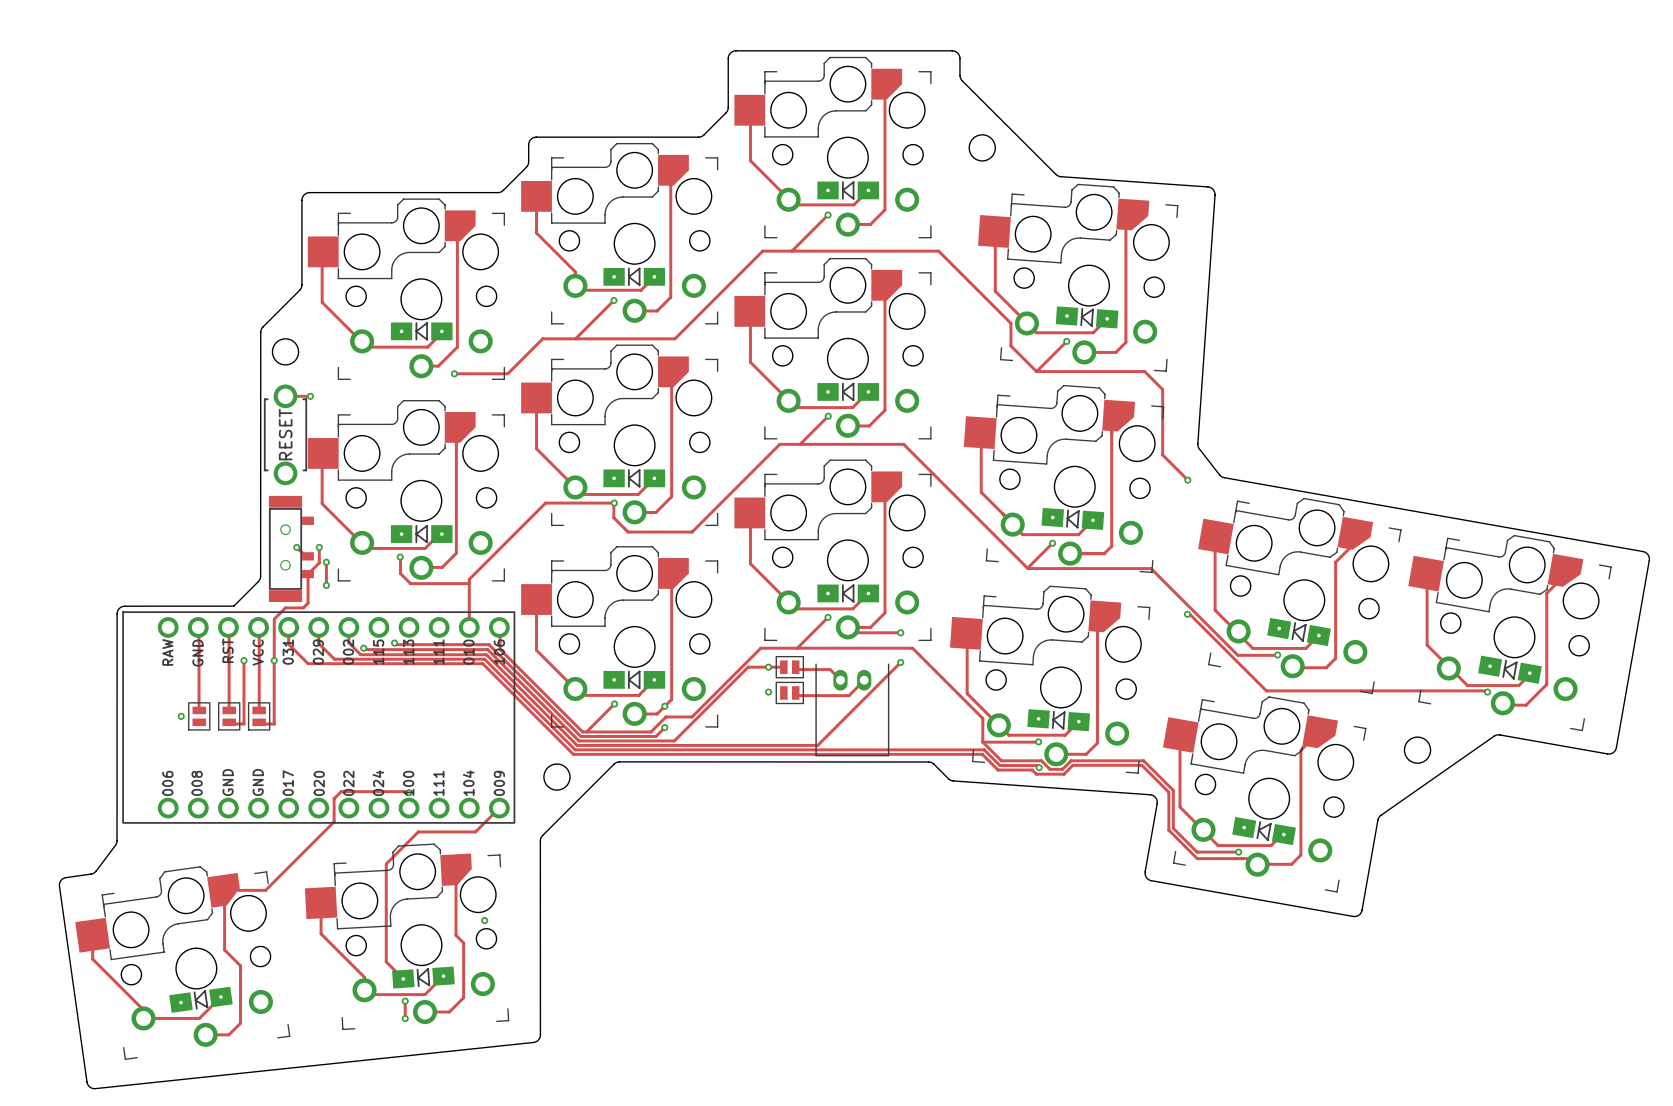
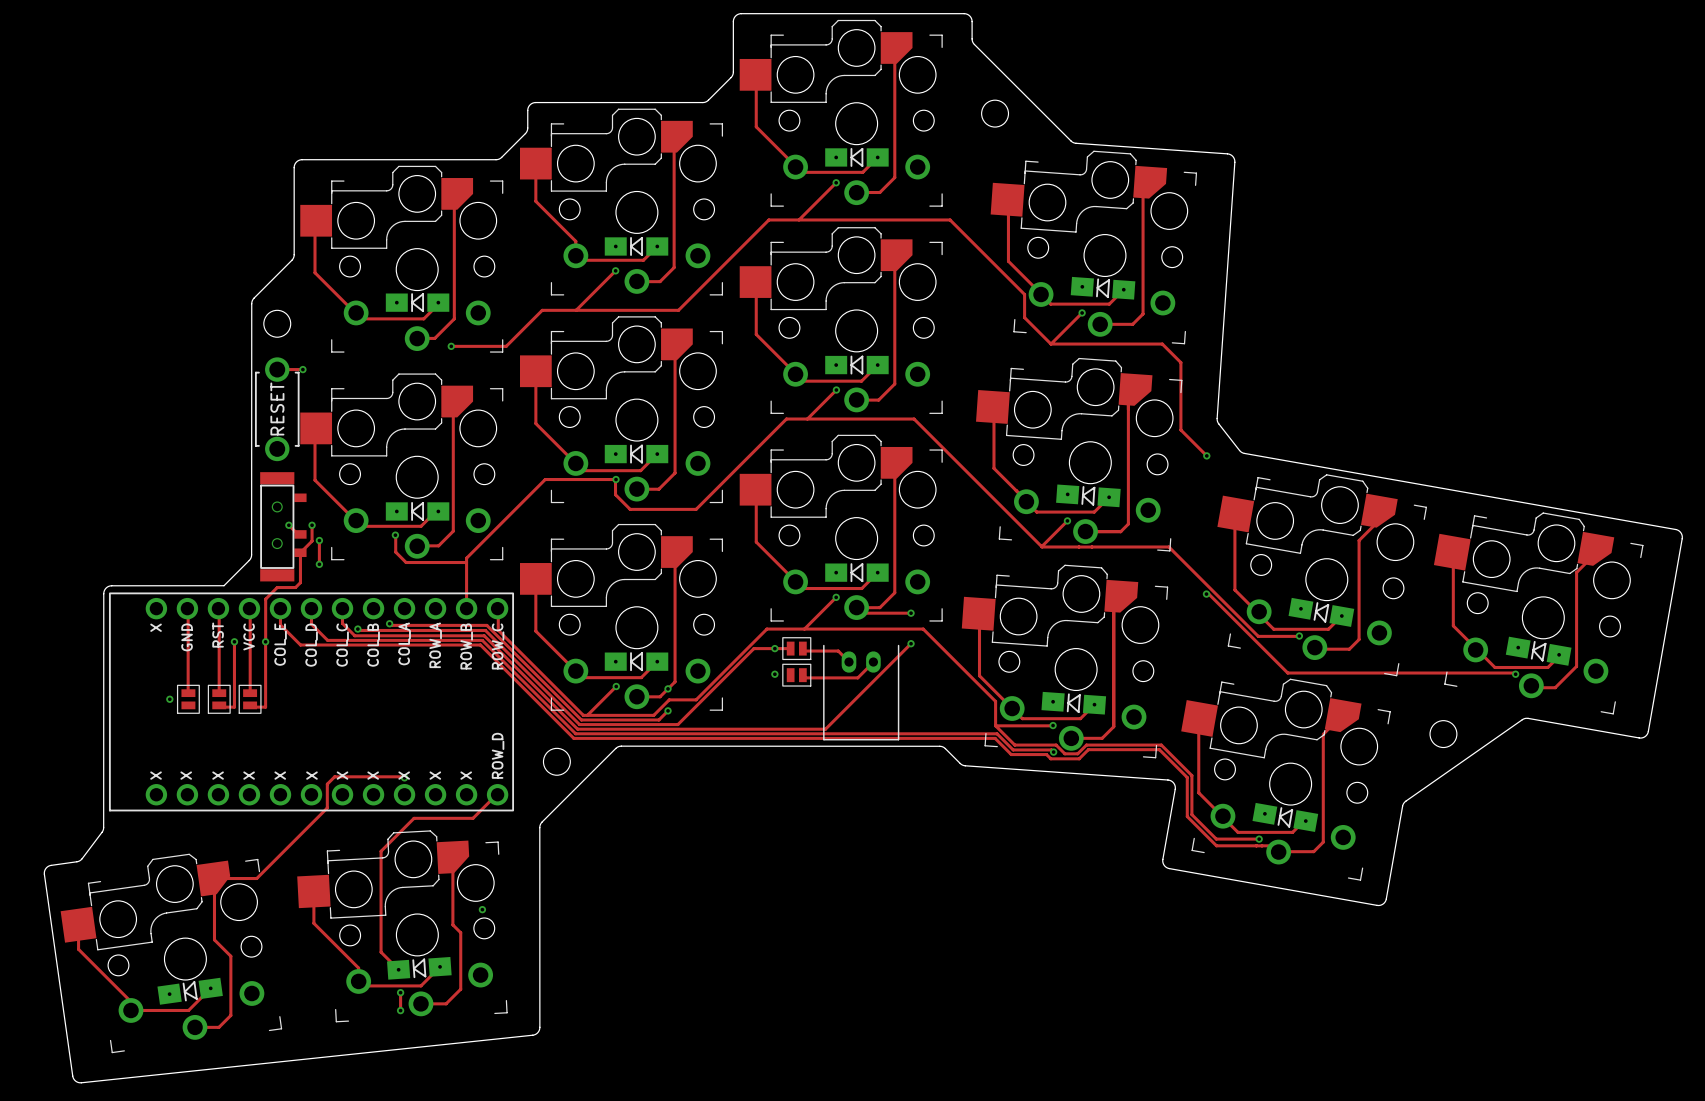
part side: bottom (318, 717) -> top (311, 701)

